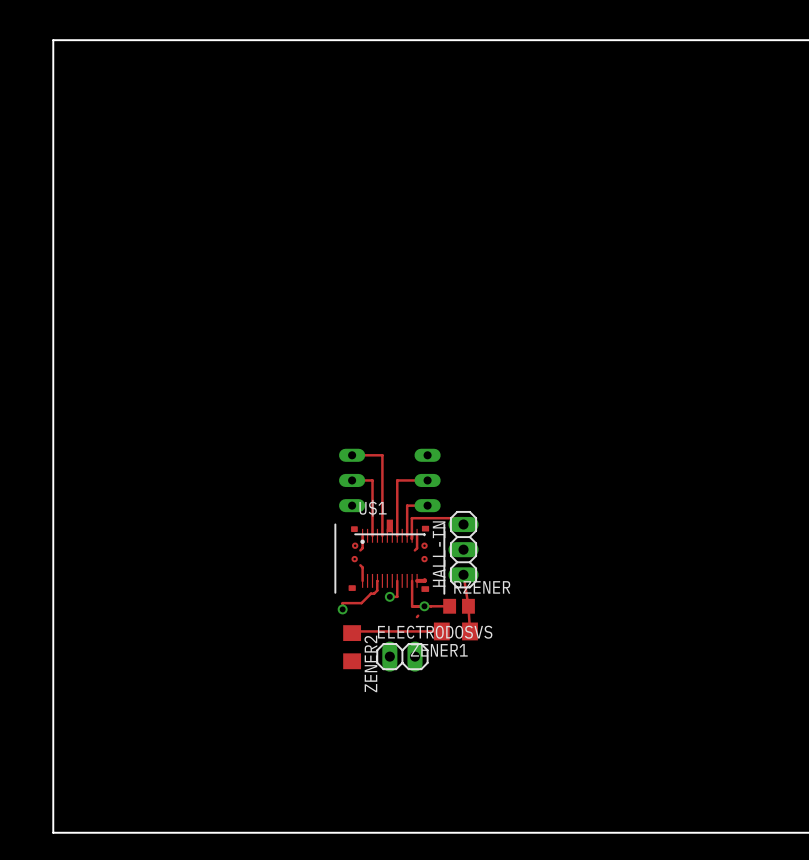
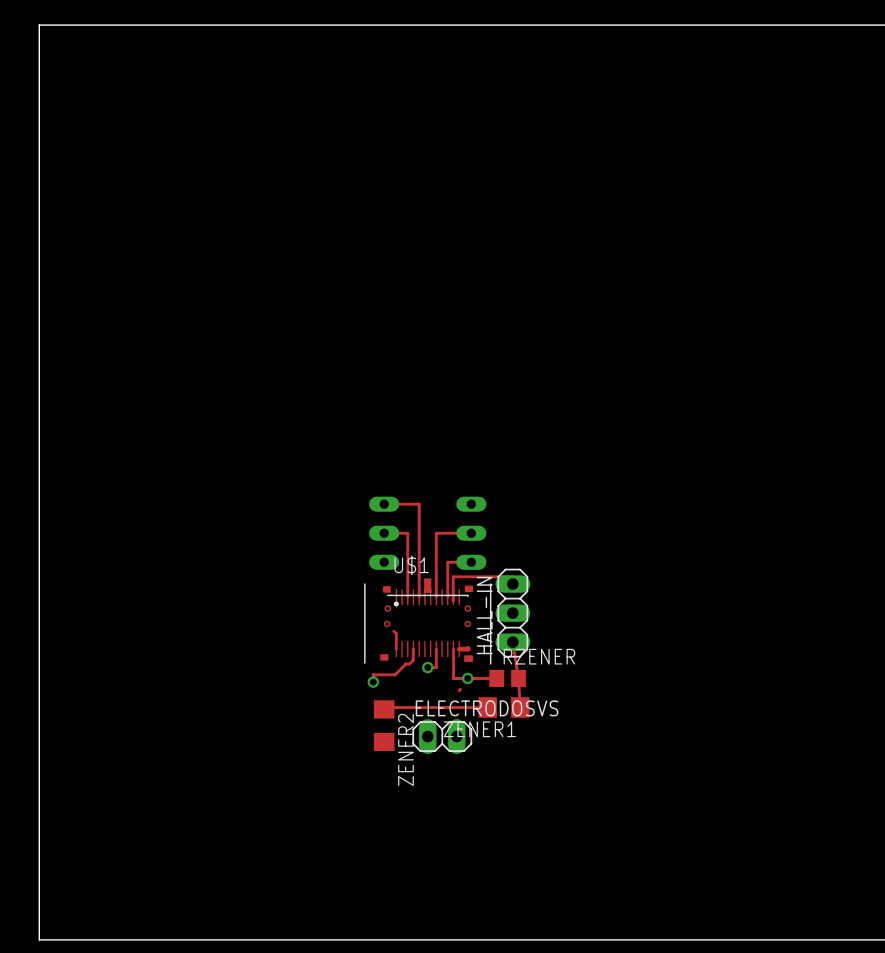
track: (362, 535) (362, 548) (360, 550) -> none
track: (417, 535) (417, 548) (414, 550) -> none

